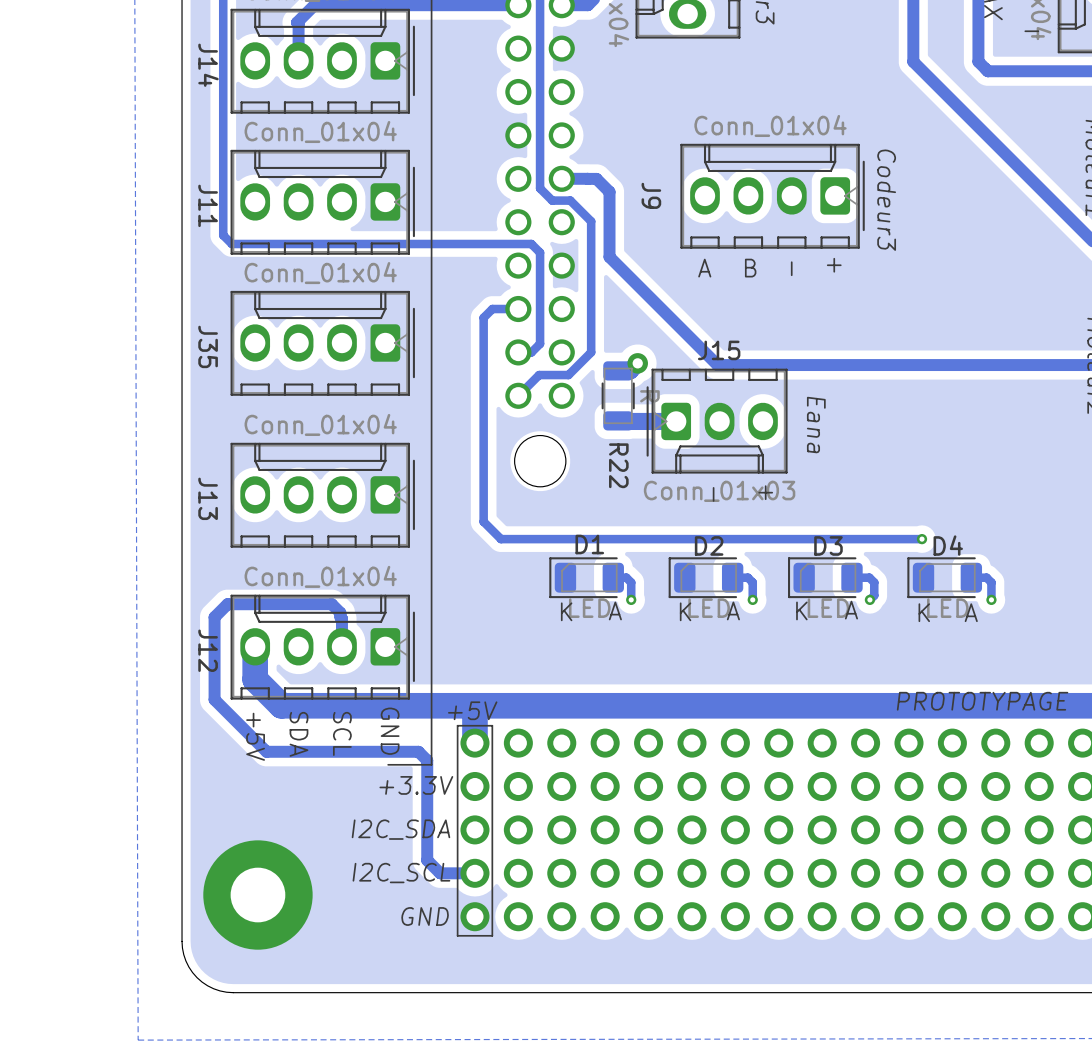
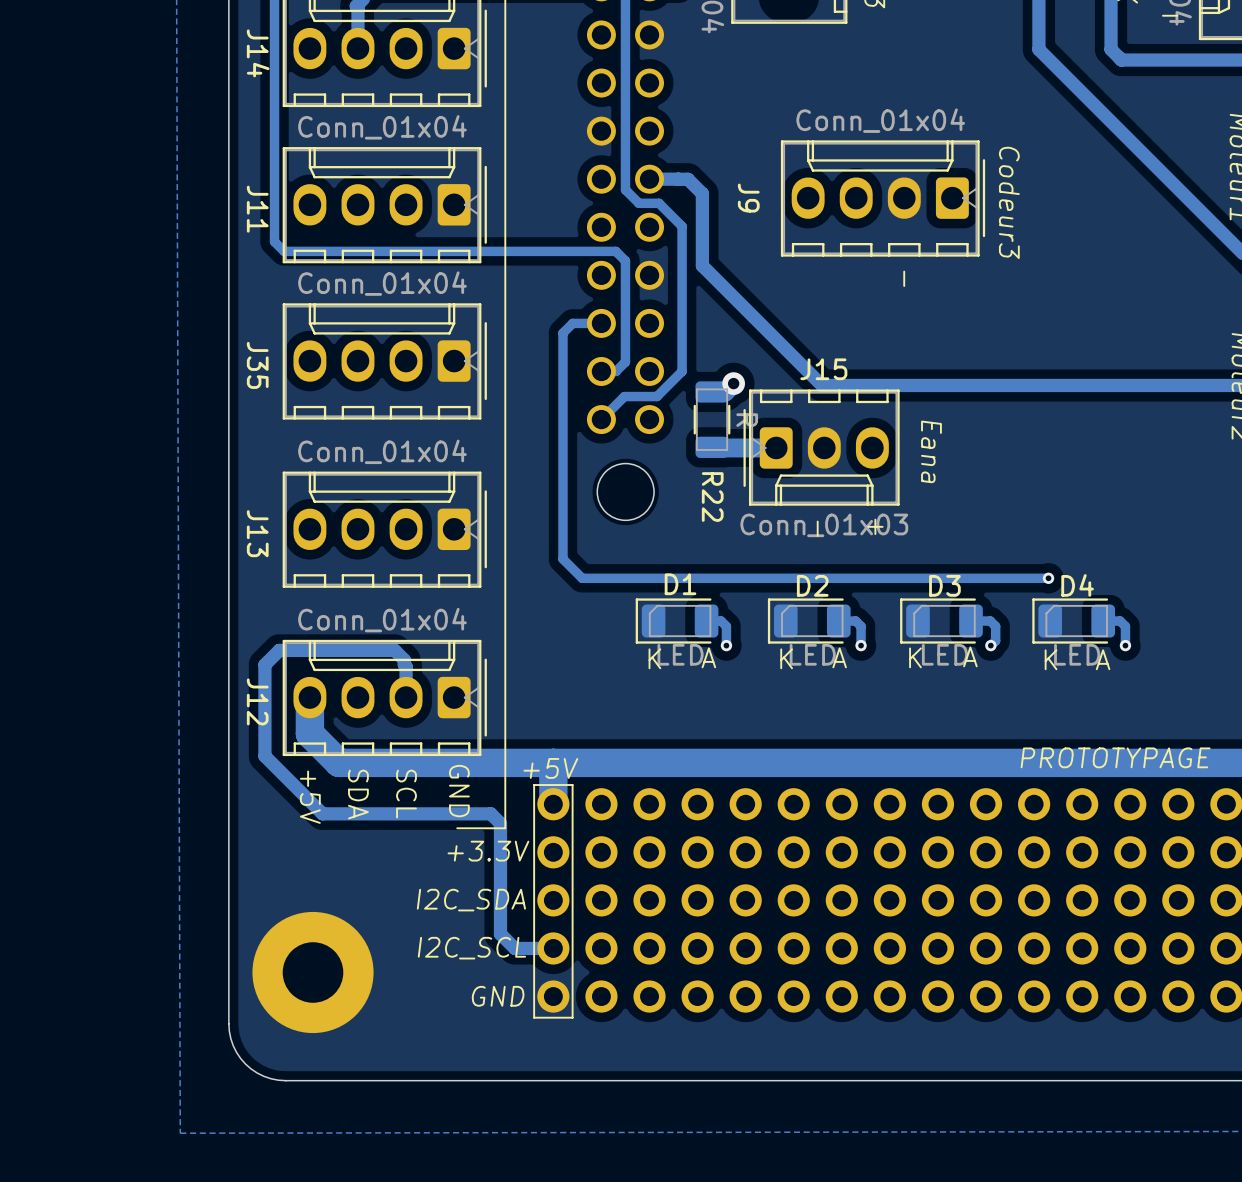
text: + (834, 265) -> none
text: A (704, 268) -> none
text: B (750, 268) -> none

